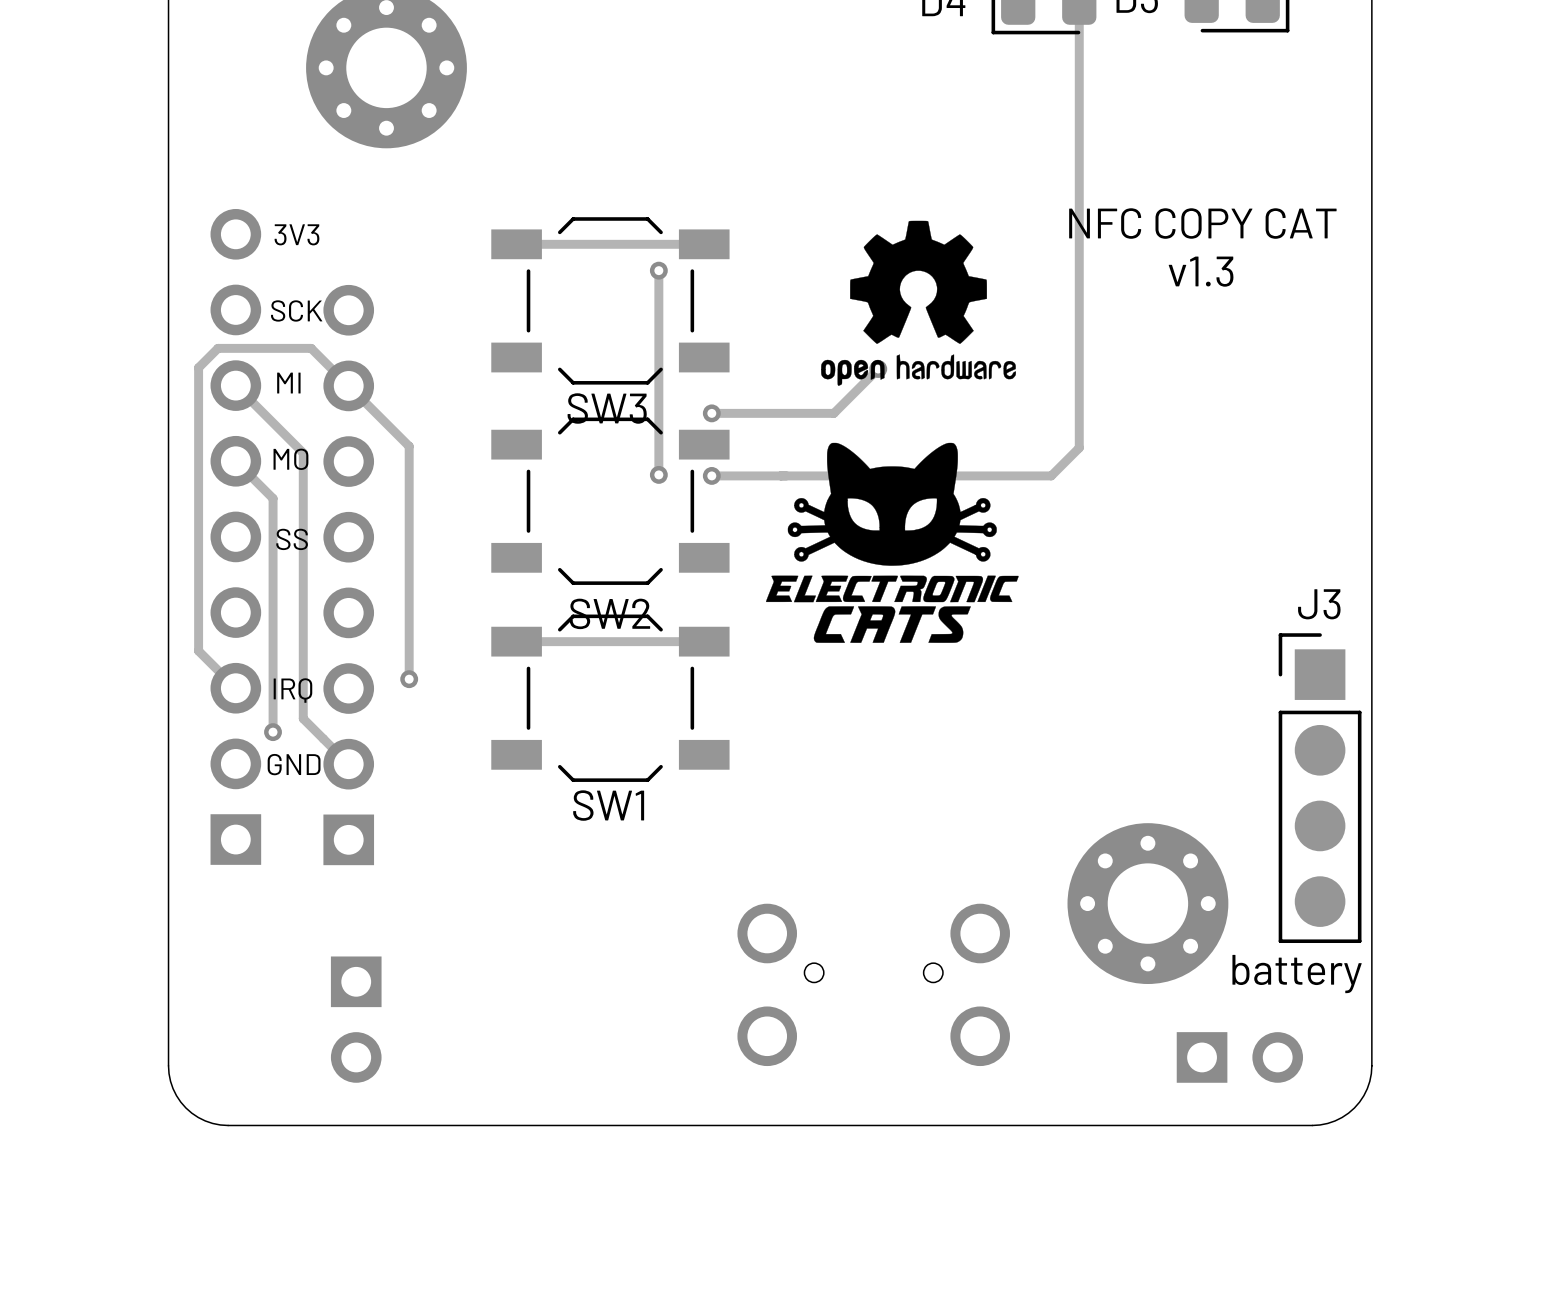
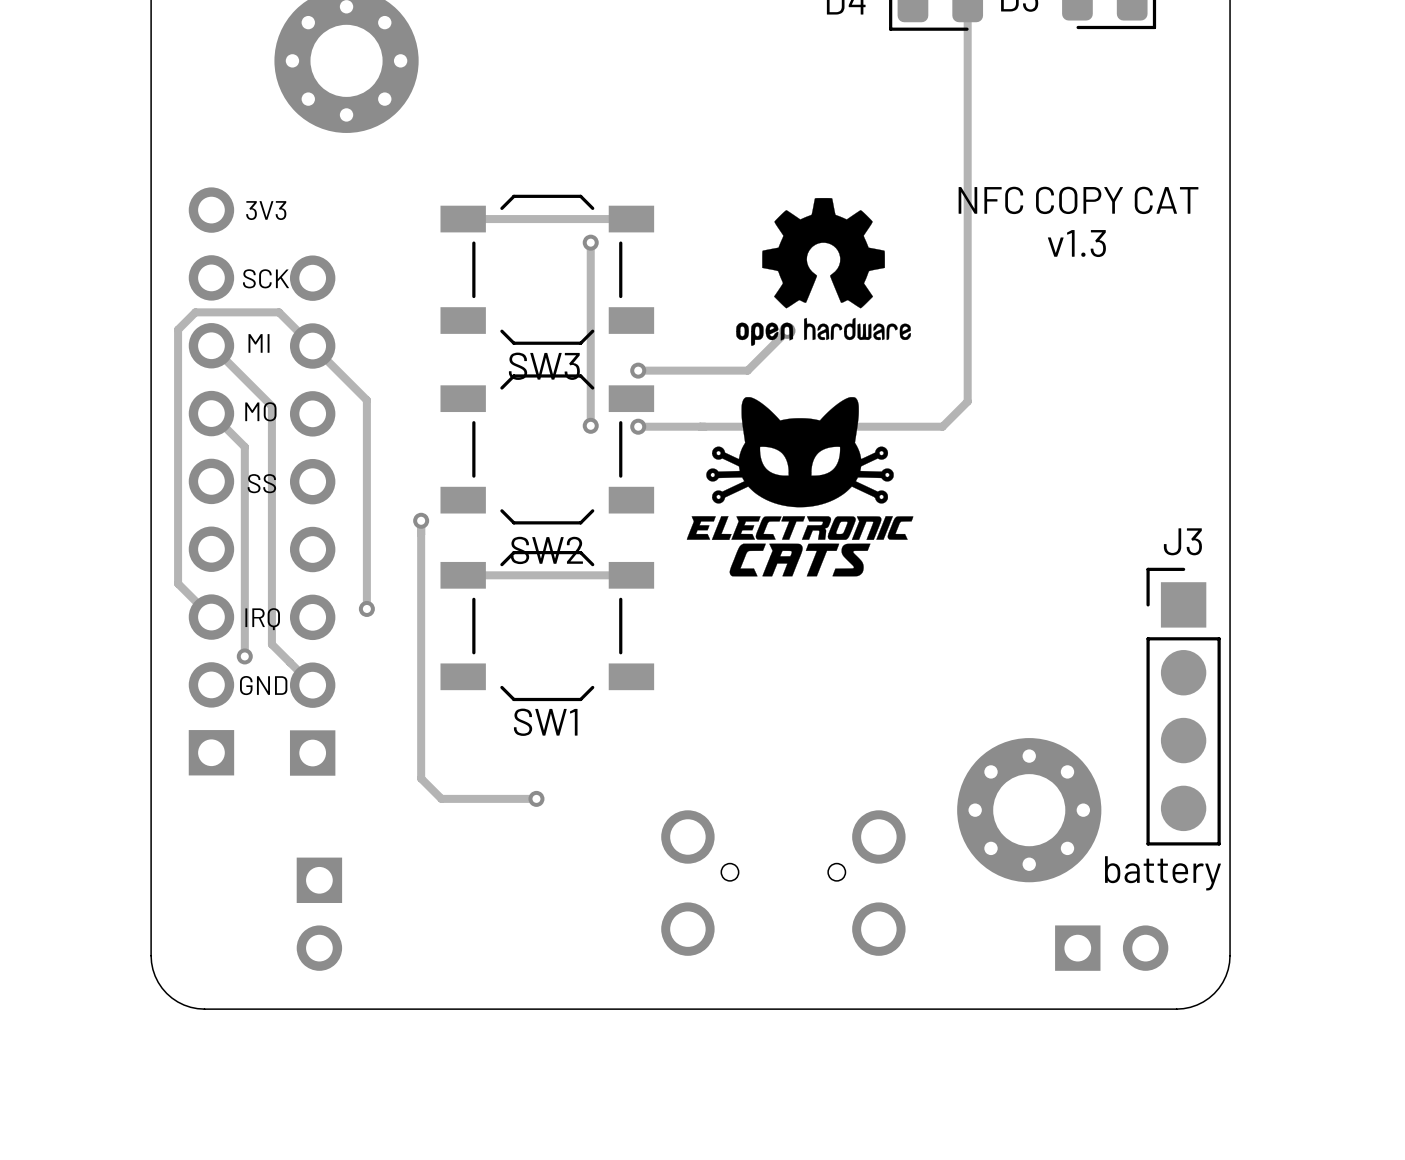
track: none -> (421, 520) (421, 778) (441, 798) (536, 798)
via: none -> (421, 520)
via: none -> (536, 798)

